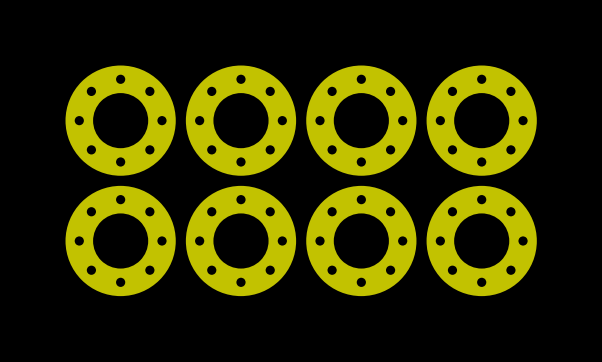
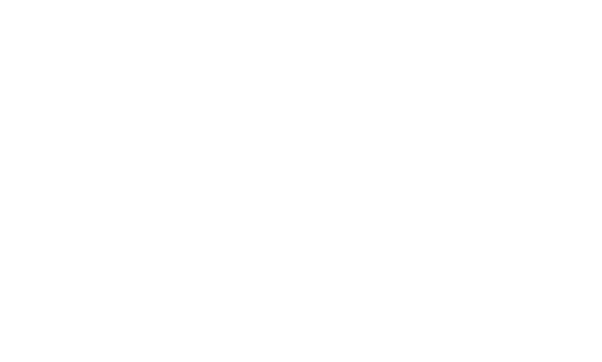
part: (120, 120) -> none
part: (240, 120) -> none
part: (361, 120) -> none
part: (481, 120) -> none
part: (120, 240) -> none
part: (240, 240) -> none
part: (361, 240) -> none
part: (481, 240) -> none

